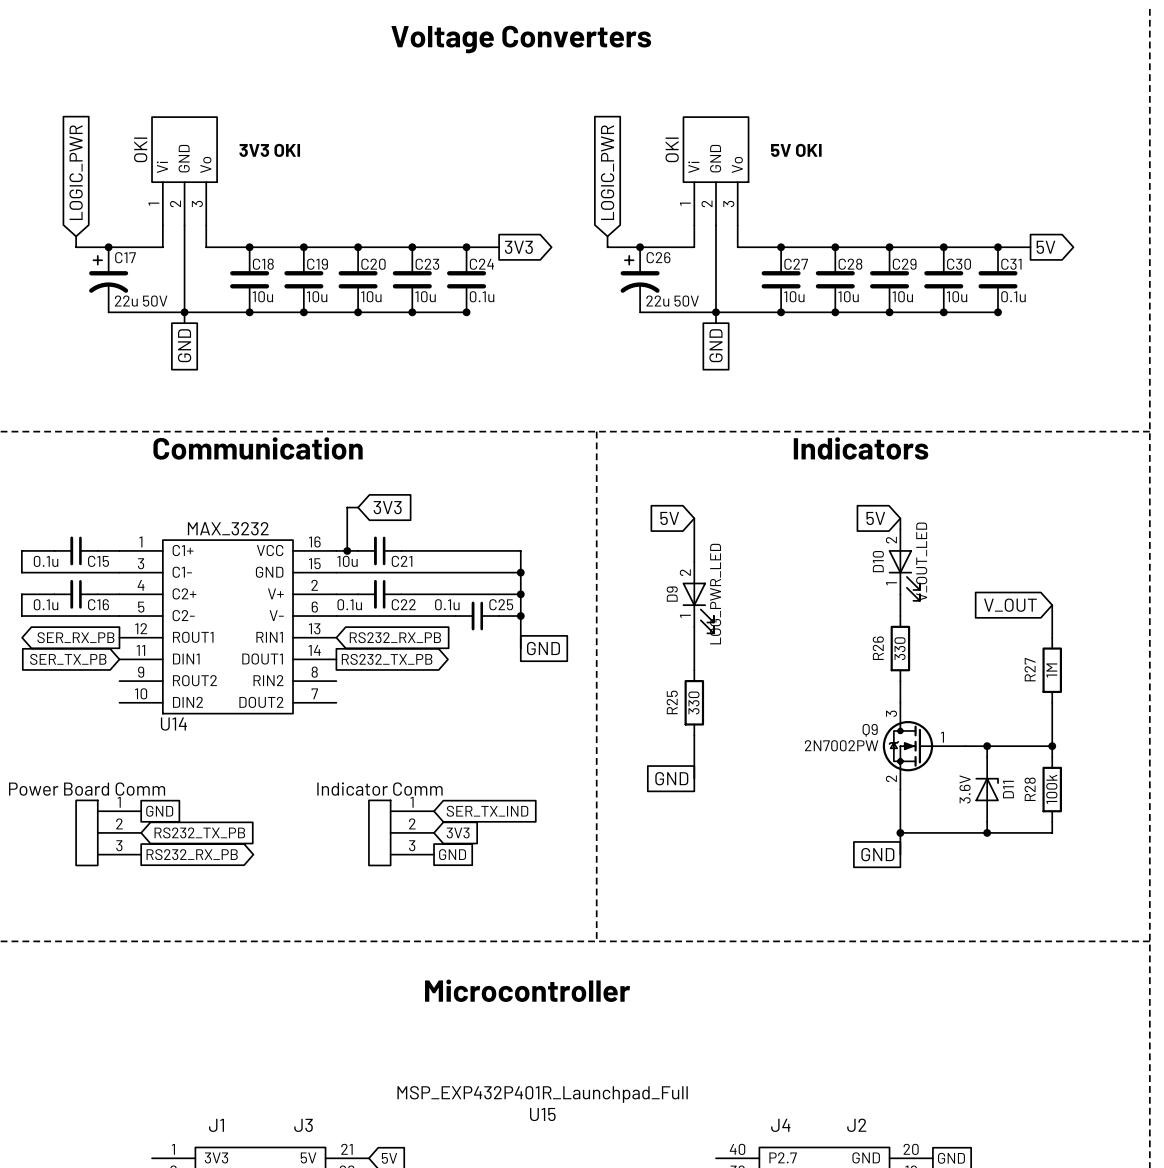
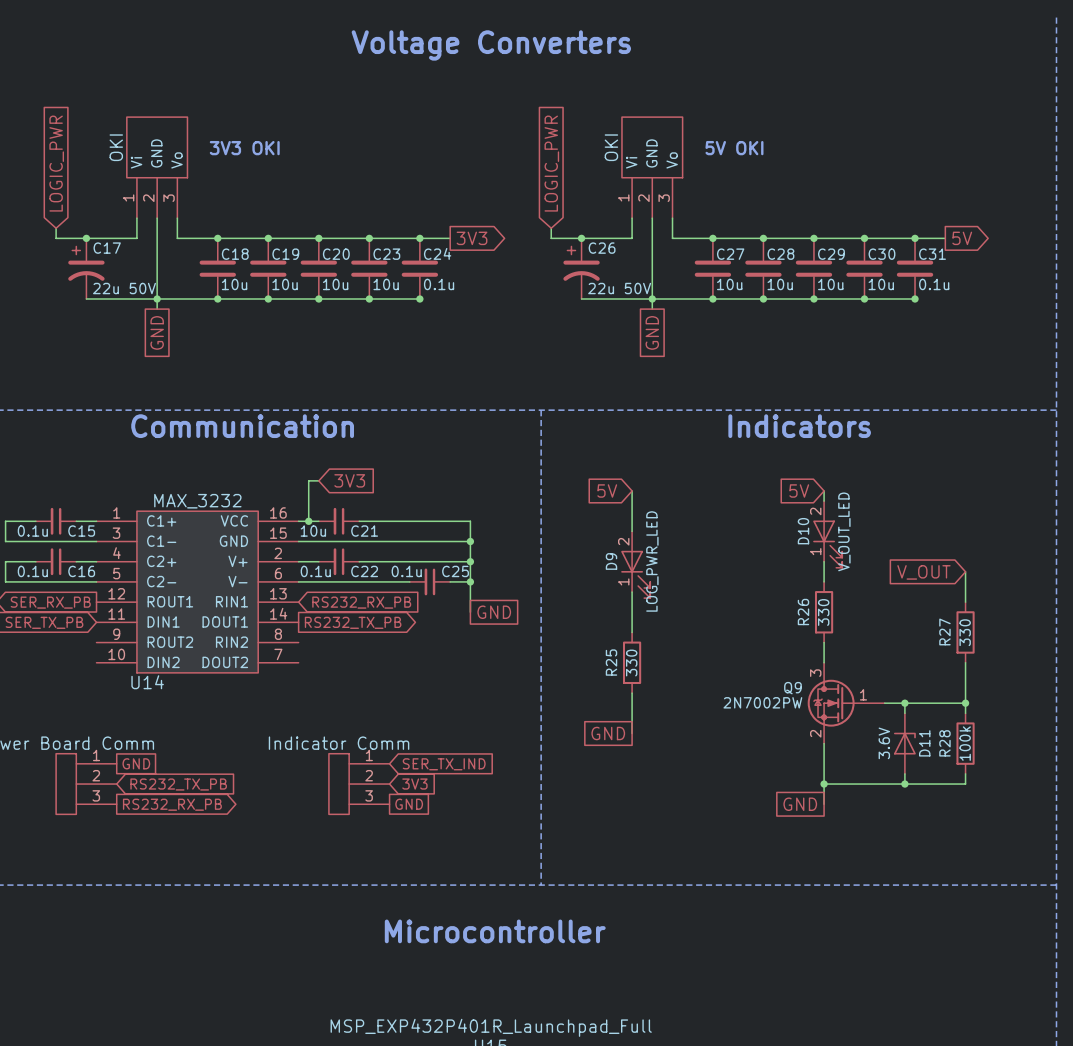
R27 value: 1M (1051, 670) -> 330 (965, 632)

